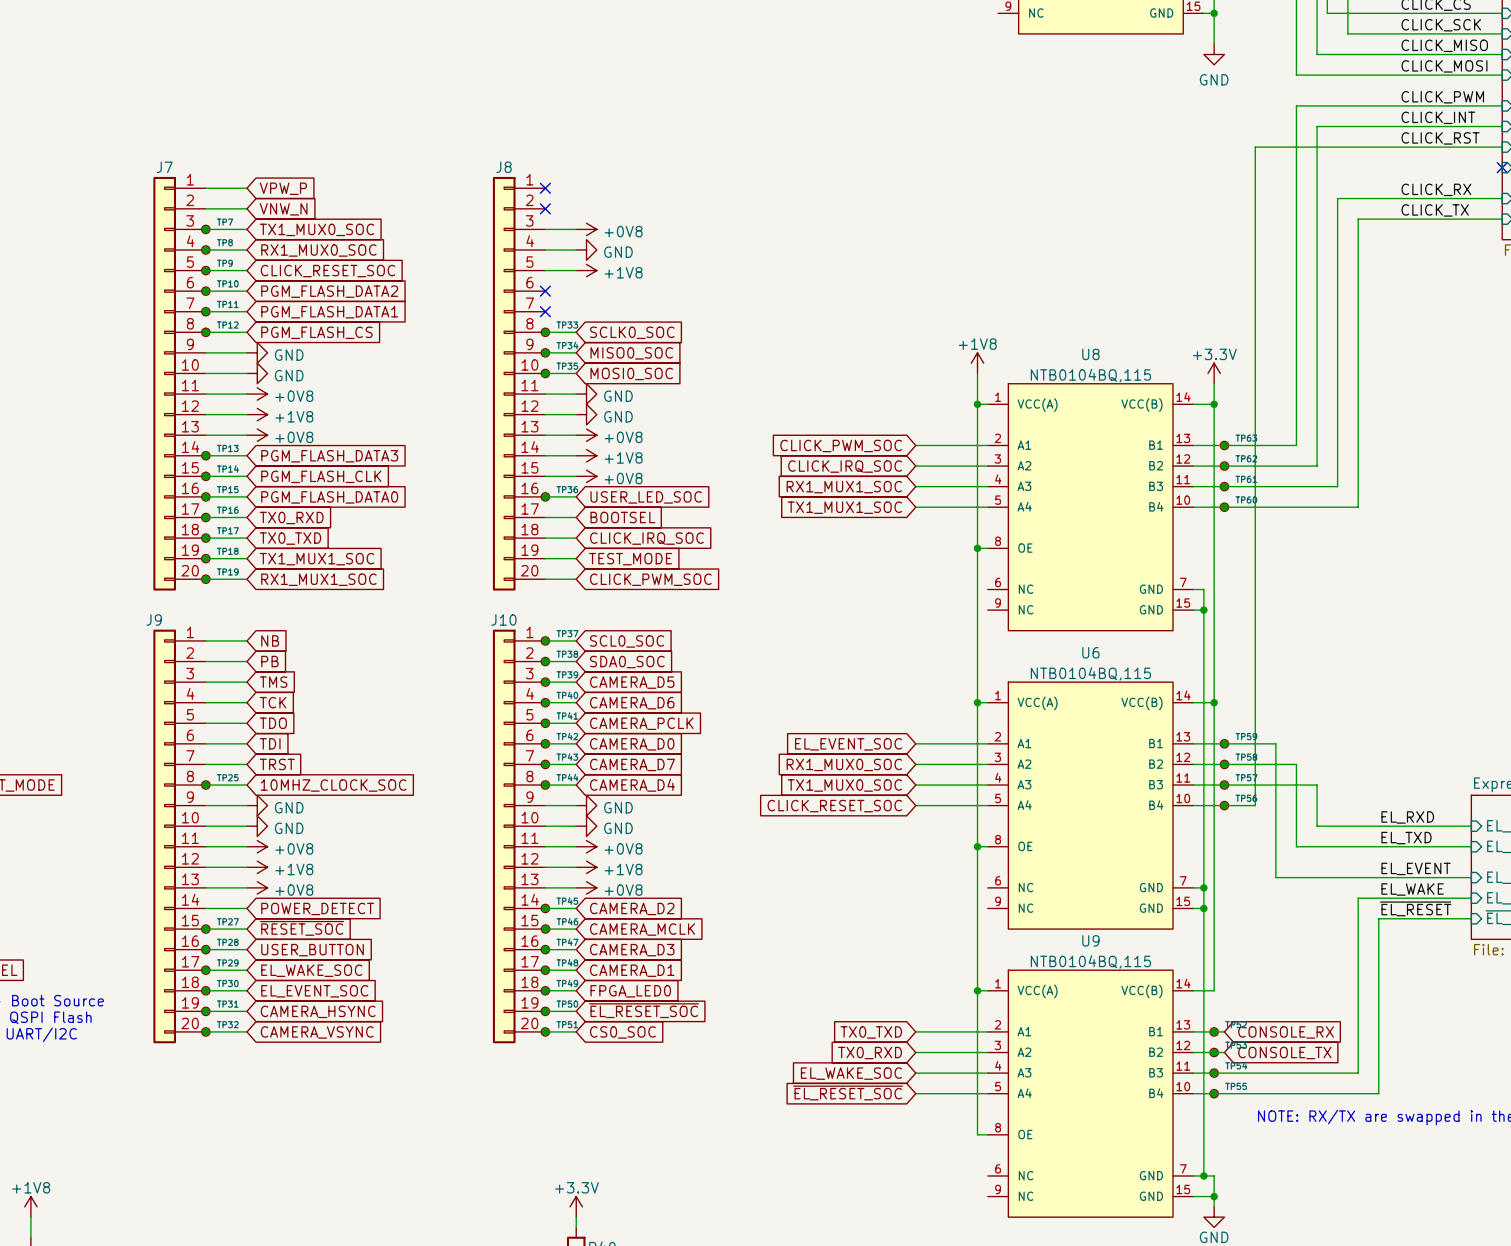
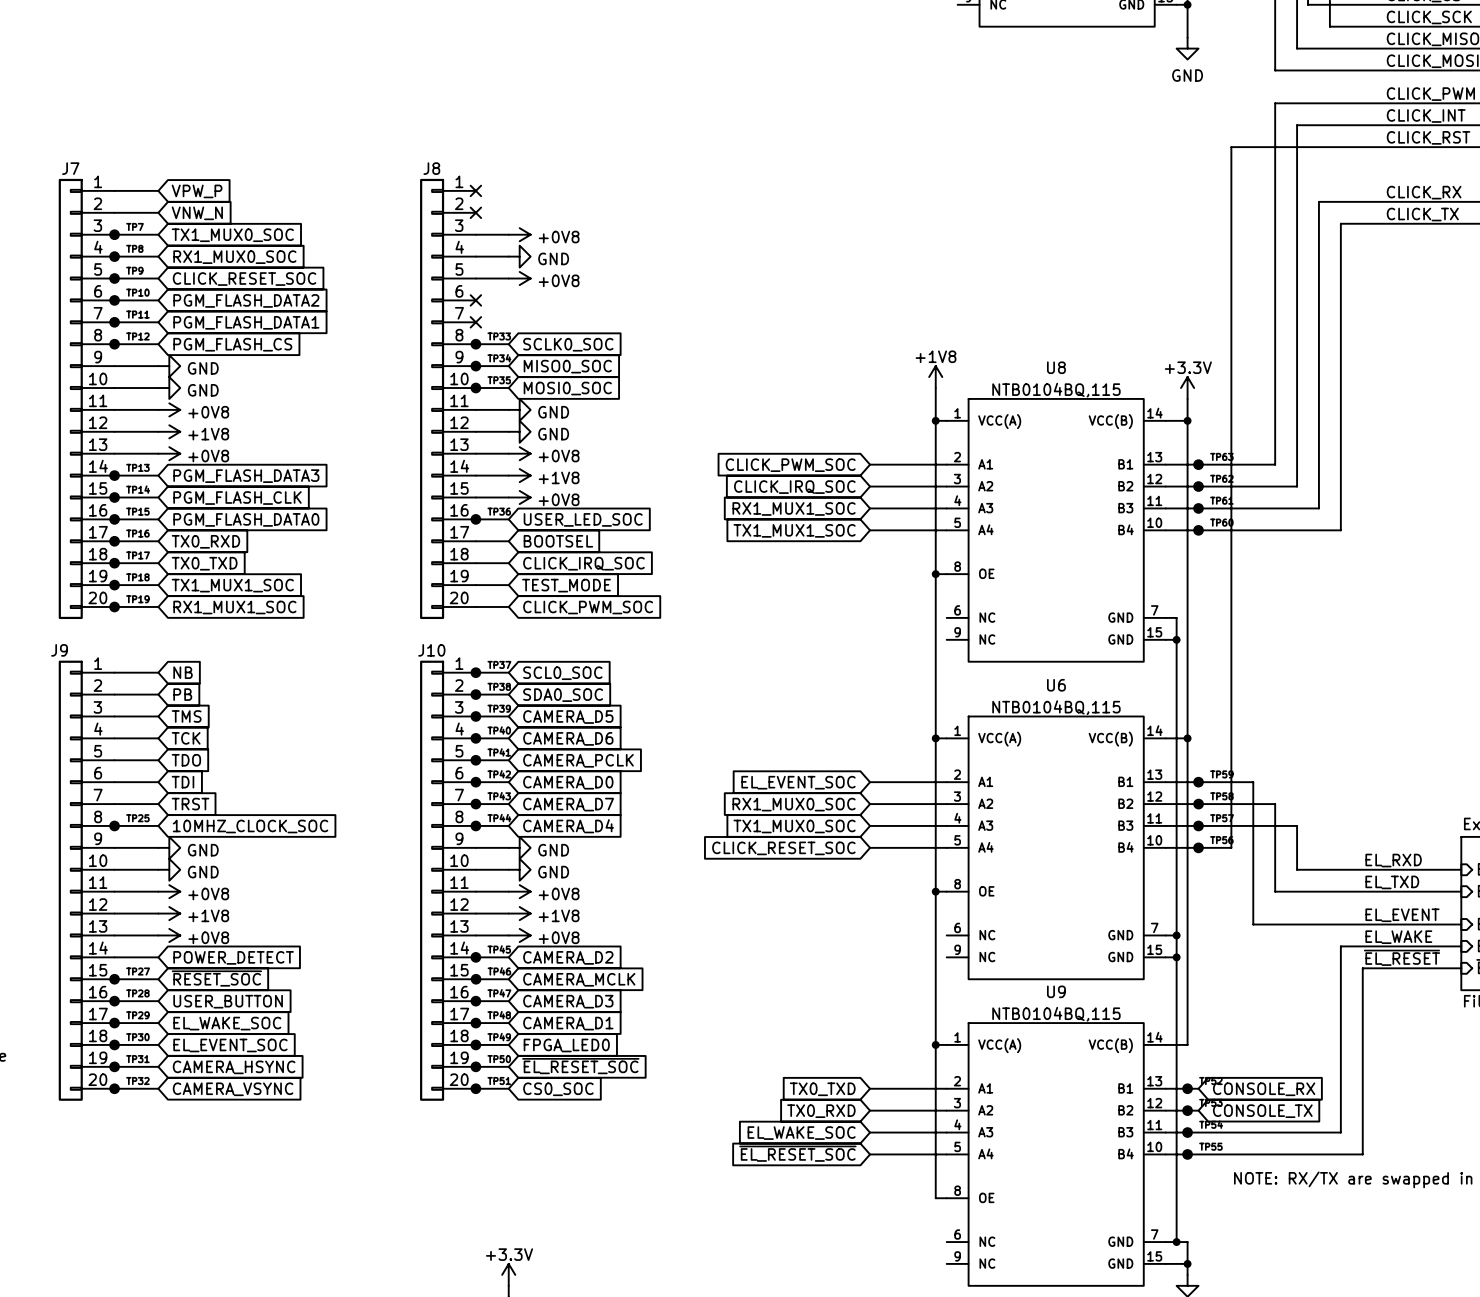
power symbol: +1V8 (586, 270) -> +0V8 (519, 278)

